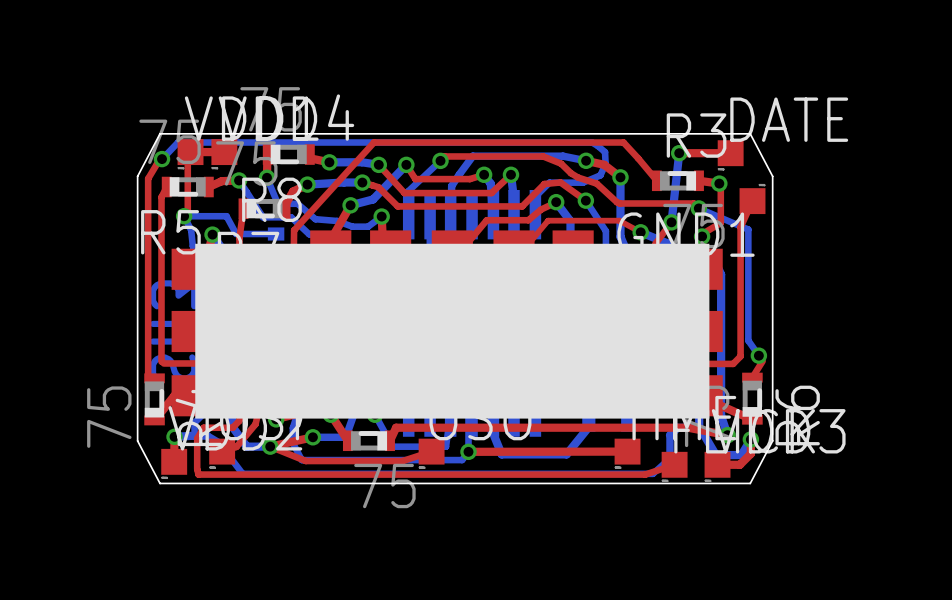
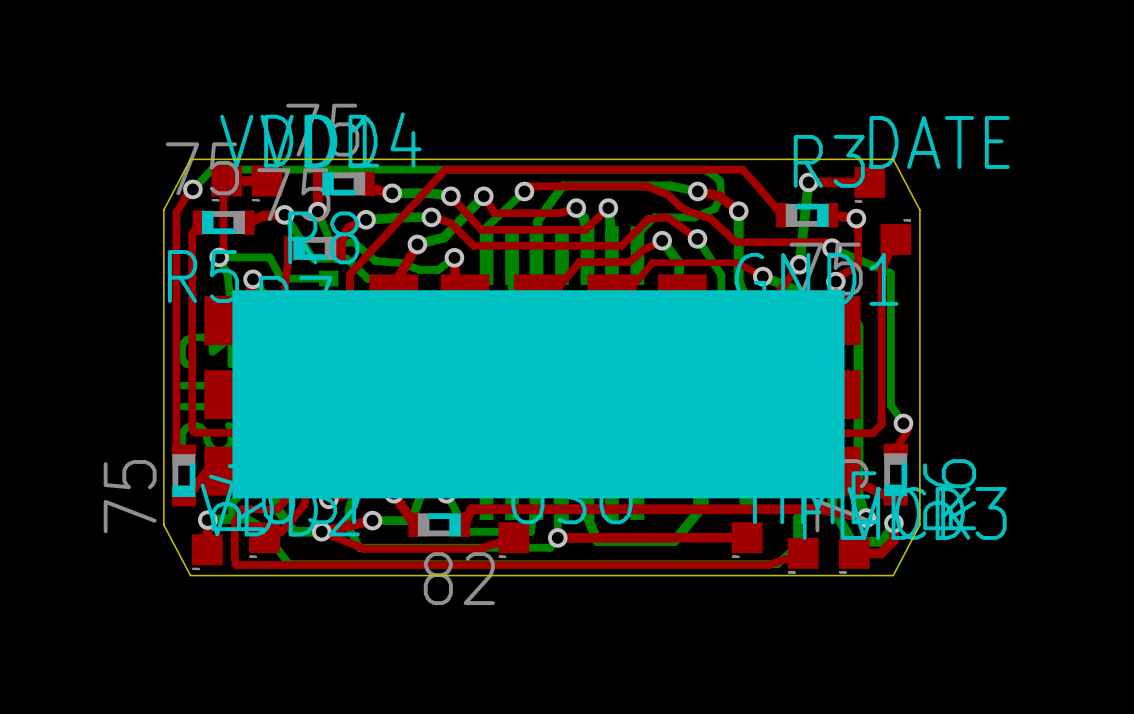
part value: 75 (384, 485) -> 82 (459, 578)

